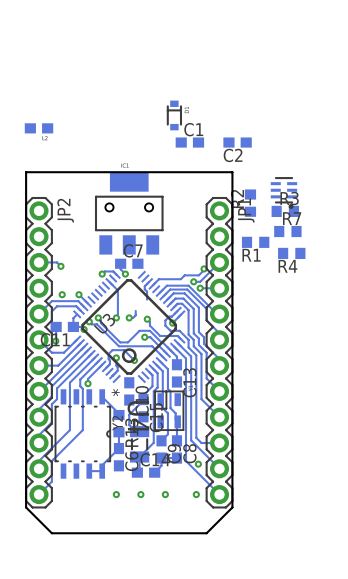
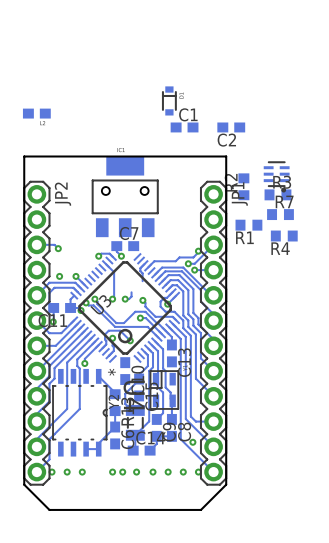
via: none -> (52, 472)
via: none -> (67, 472)
via: none -> (82, 472)
via: none -> (122, 472)
via: none -> (153, 472)
via: (165, 494) -> none
via: none -> (168, 472)
via: none -> (183, 472)
via: (196, 494) -> none
via: none -> (198, 472)

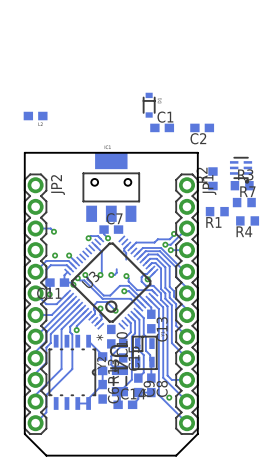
via: (52, 472) -> none
via: (67, 472) -> none
via: (82, 472) -> none
via: (112, 472) -> none
via: (122, 472) -> none
via: (136, 472) -> none
via: (153, 472) -> none
via: (168, 472) -> none
via: (183, 472) -> none
via: (198, 472) -> none

